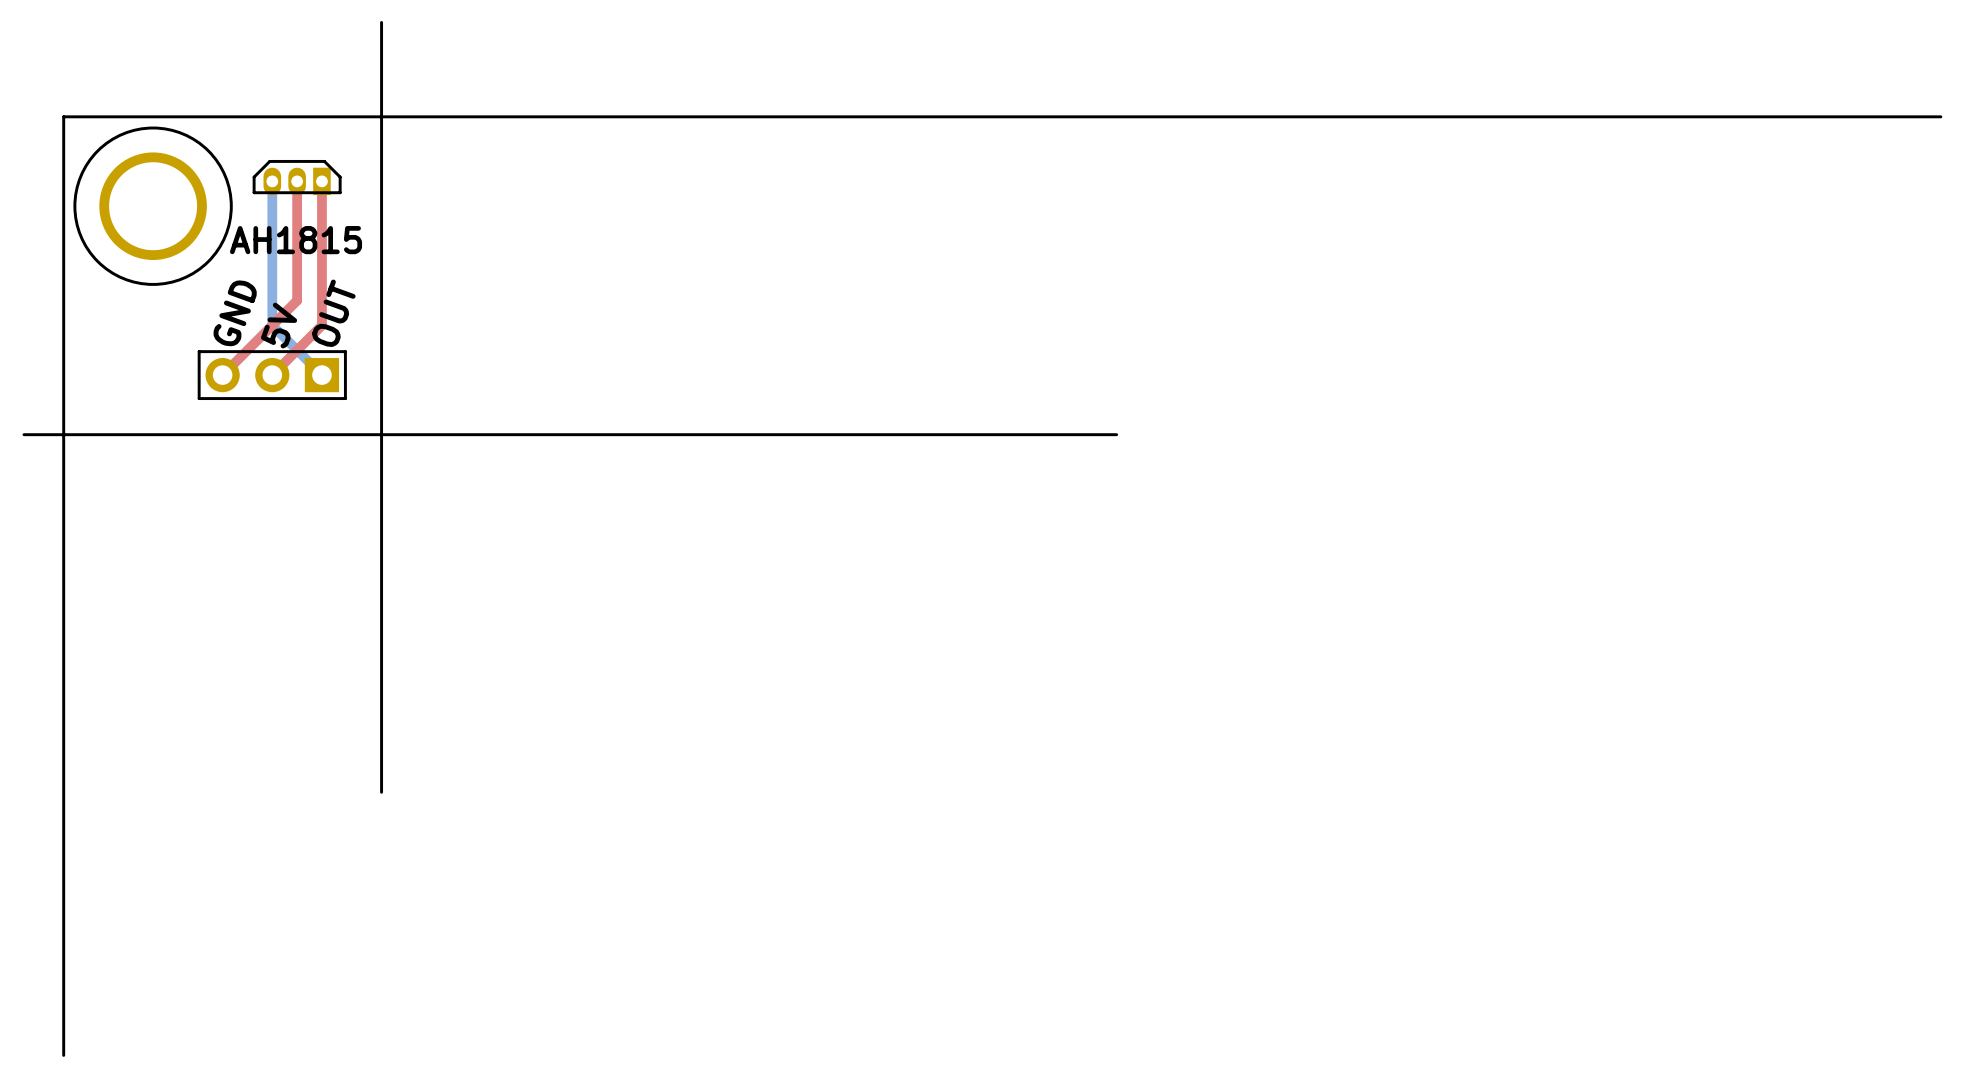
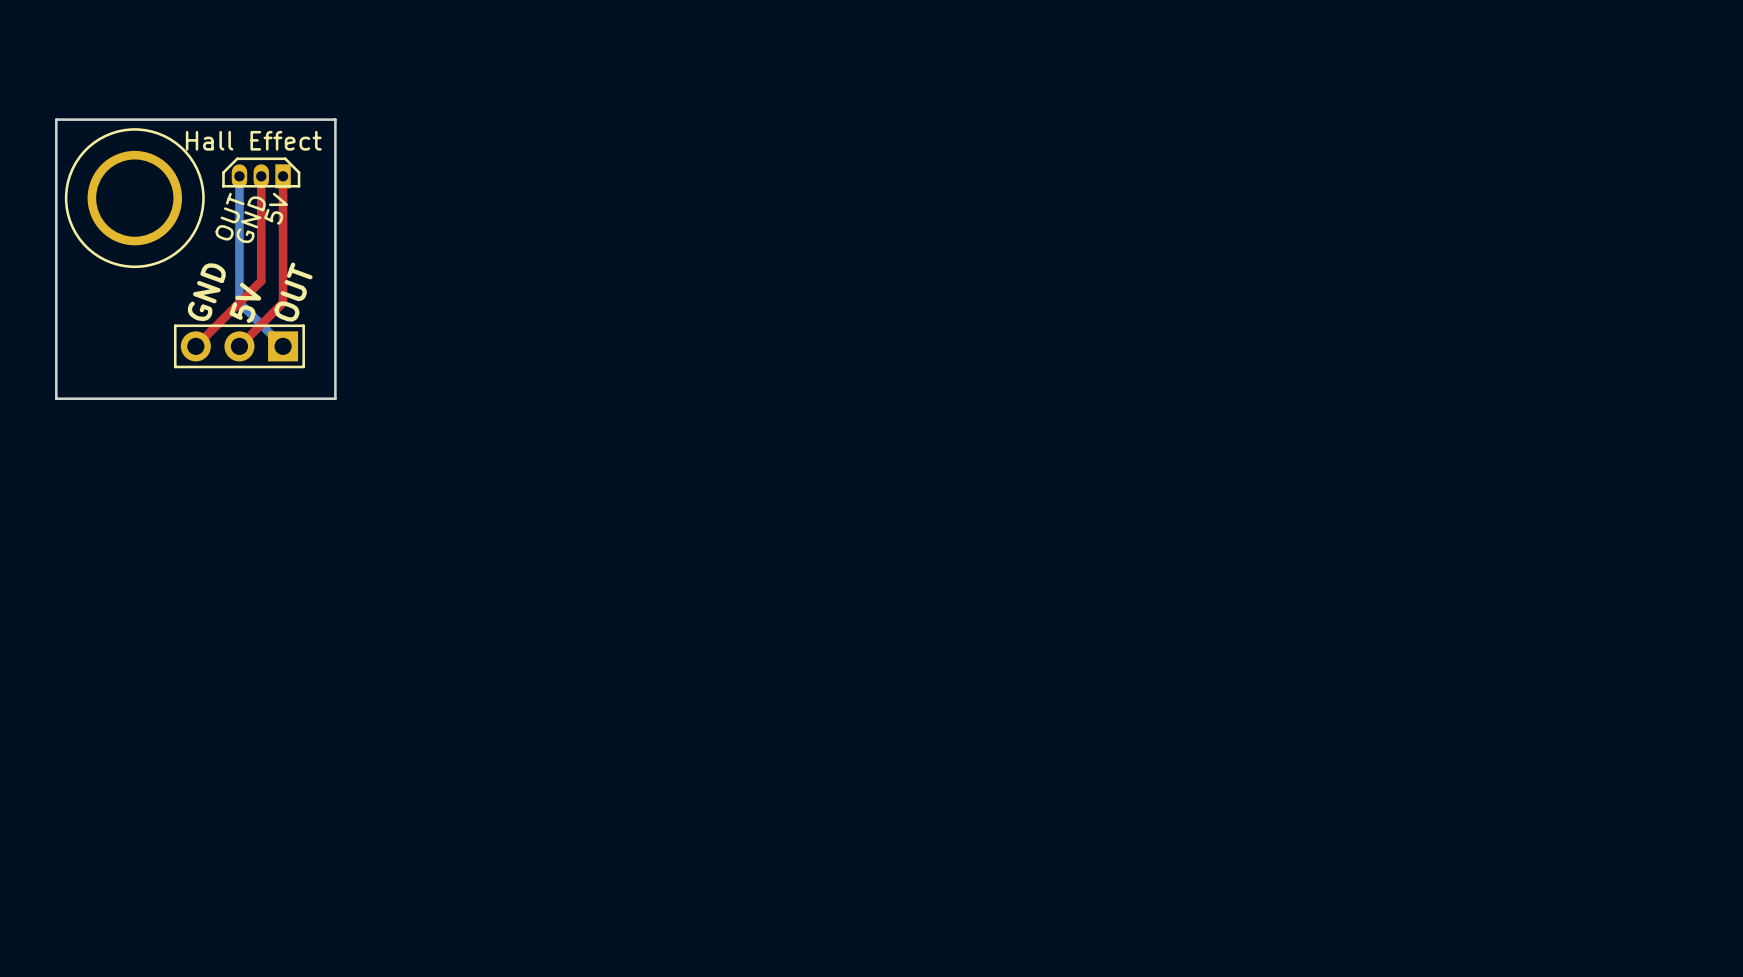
board edge: (381, 22) (381, 116) (1940, 116) -> none
text: none -> Hall Effect (253, 140)
text: none -> 5V (276, 208)
text: none -> OUT (230, 216)
text: none -> GND (251, 219)
text: AH1815 (296, 240) -> none
board edge: (23, 434) (63, 434) (63, 1055) -> none
board edge: (1116, 434) (381, 434) (381, 792) -> none

